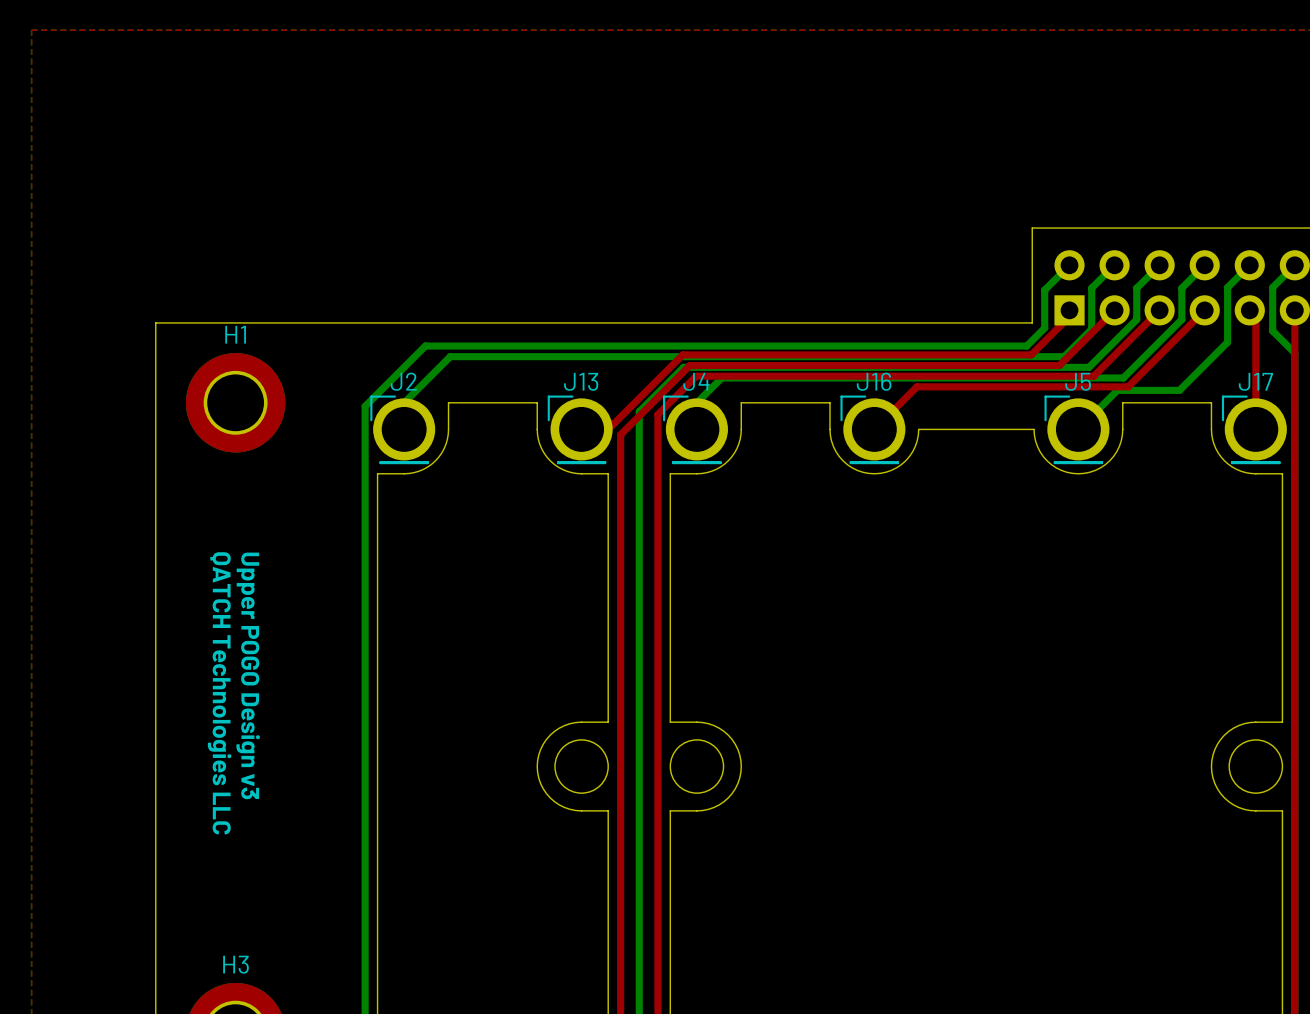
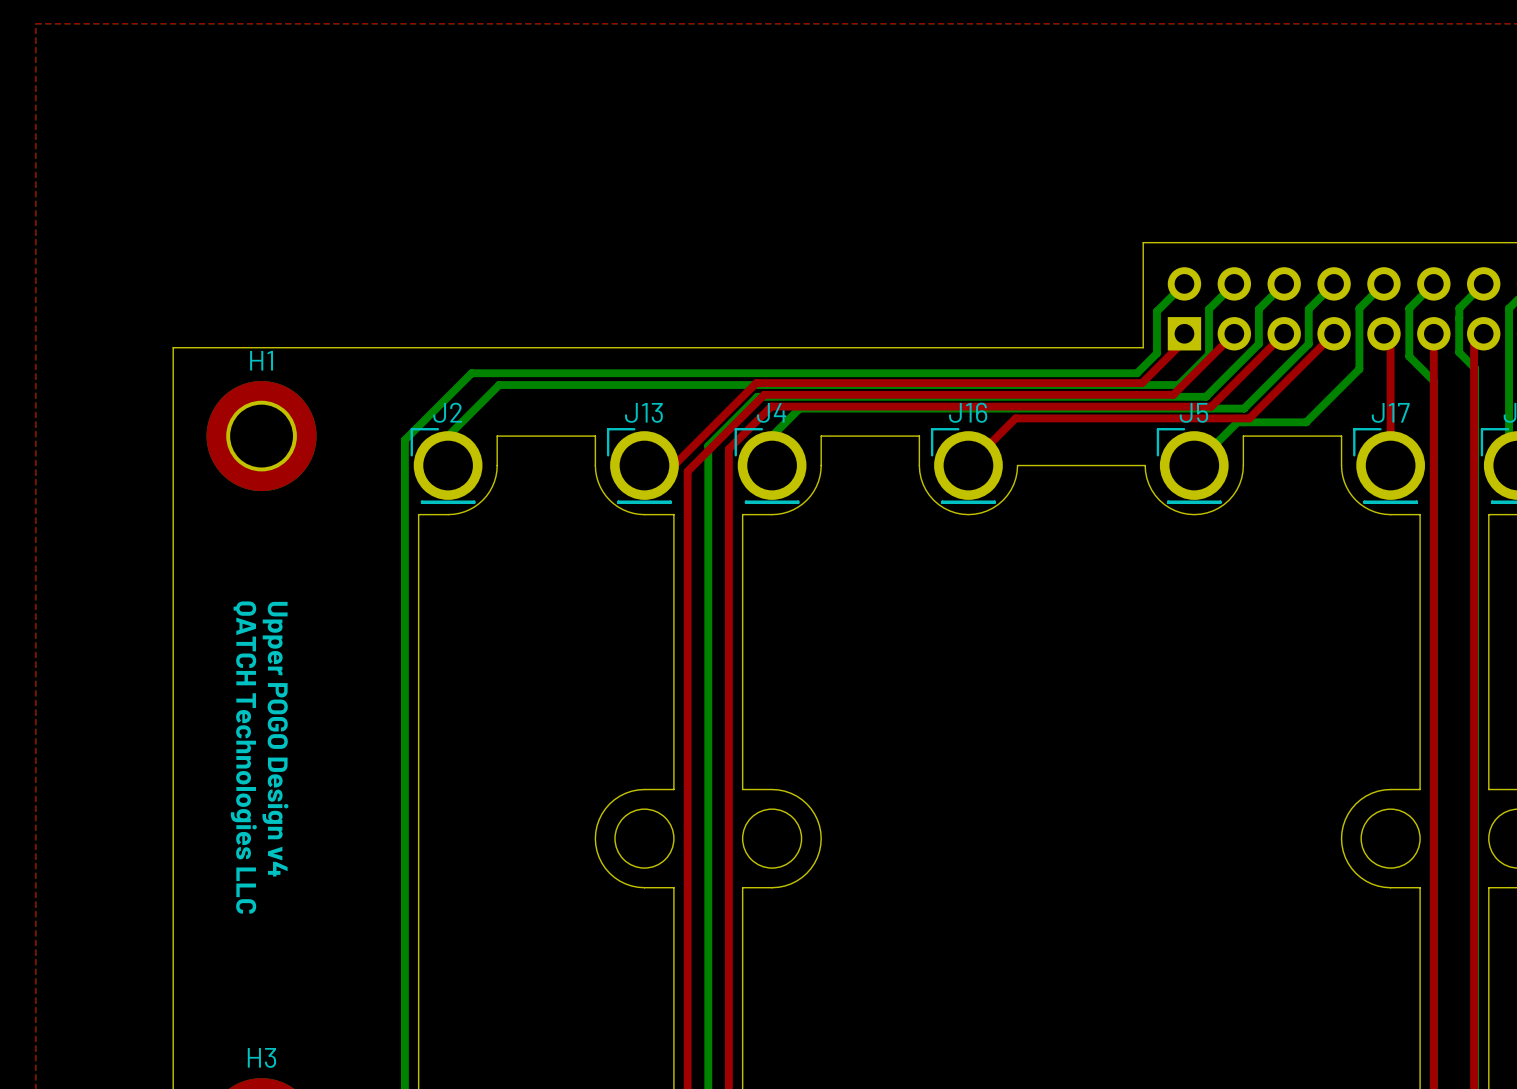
text: Upper POGO Design v3 (248, 675) -> Upper POGO Design v4 (275, 739)

